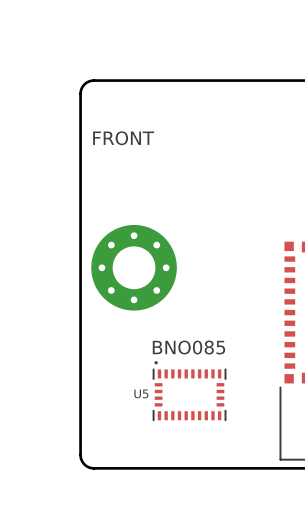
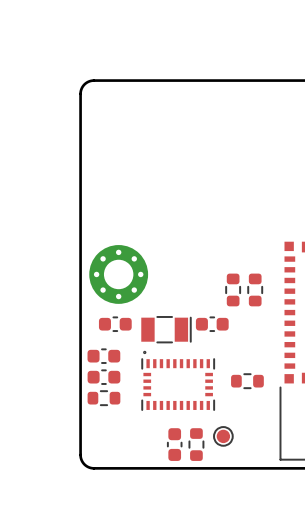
text: FRONT (123, 138) -> none
part: (134, 267) -> none
part: none -> (118, 274)
part: none -> (233, 289)
part: none -> (255, 289)
part: none -> (115, 324)
part: none -> (212, 324)
part: none -> (166, 329)
text: BNO085 (188, 347) -> none
part: none -> (103, 356)
part: none -> (103, 377)
part: none -> (178, 380)
part: none -> (247, 381)
U5: (189, 391) -> none
part: none -> (103, 398)
part: none -> (223, 436)
part: none -> (174, 444)
part: none -> (196, 444)

